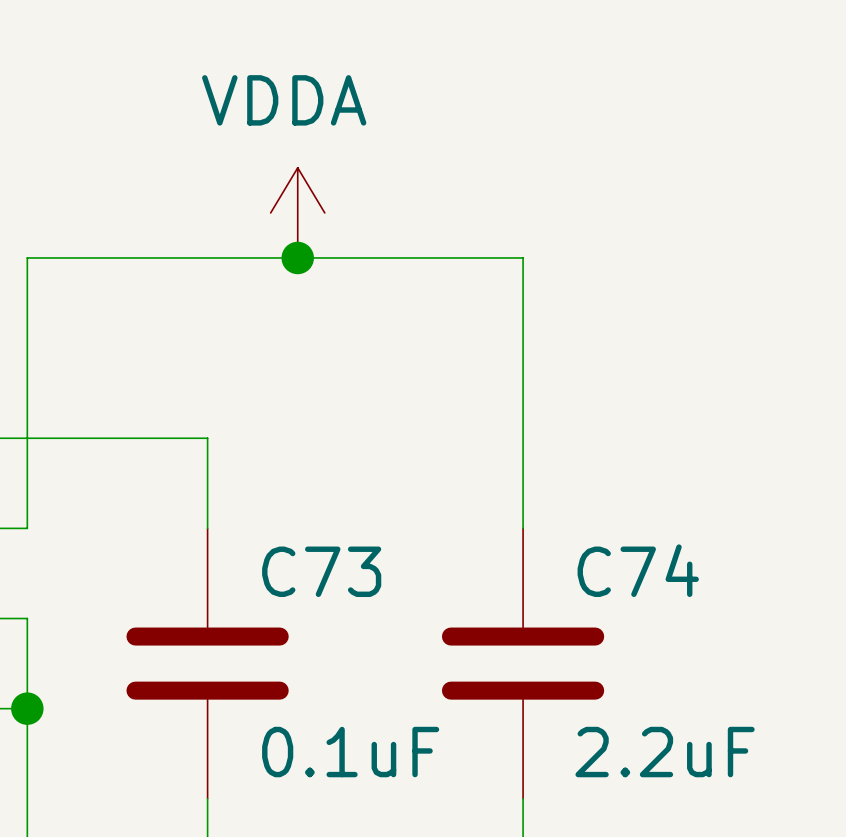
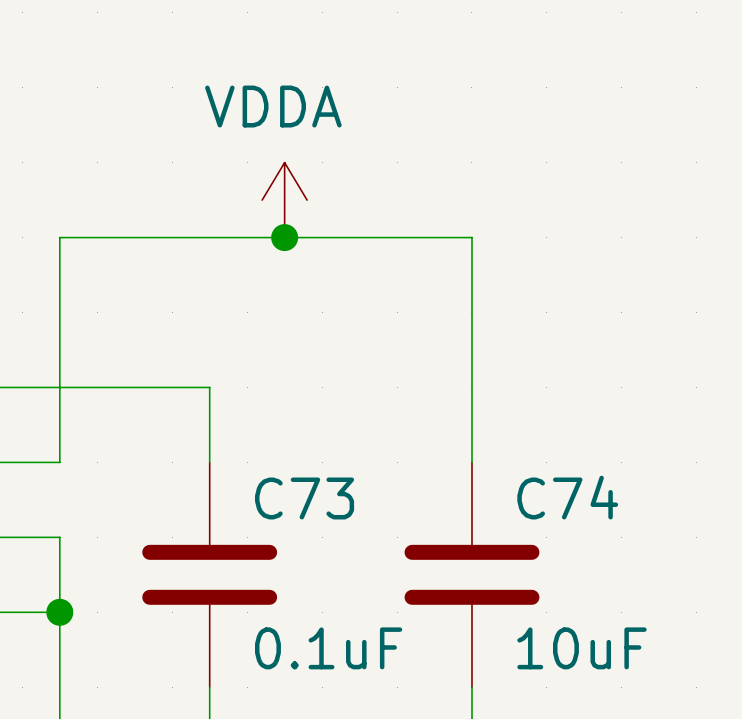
C74 value: 2.2uF (665, 752) -> 10uF (582, 648)

